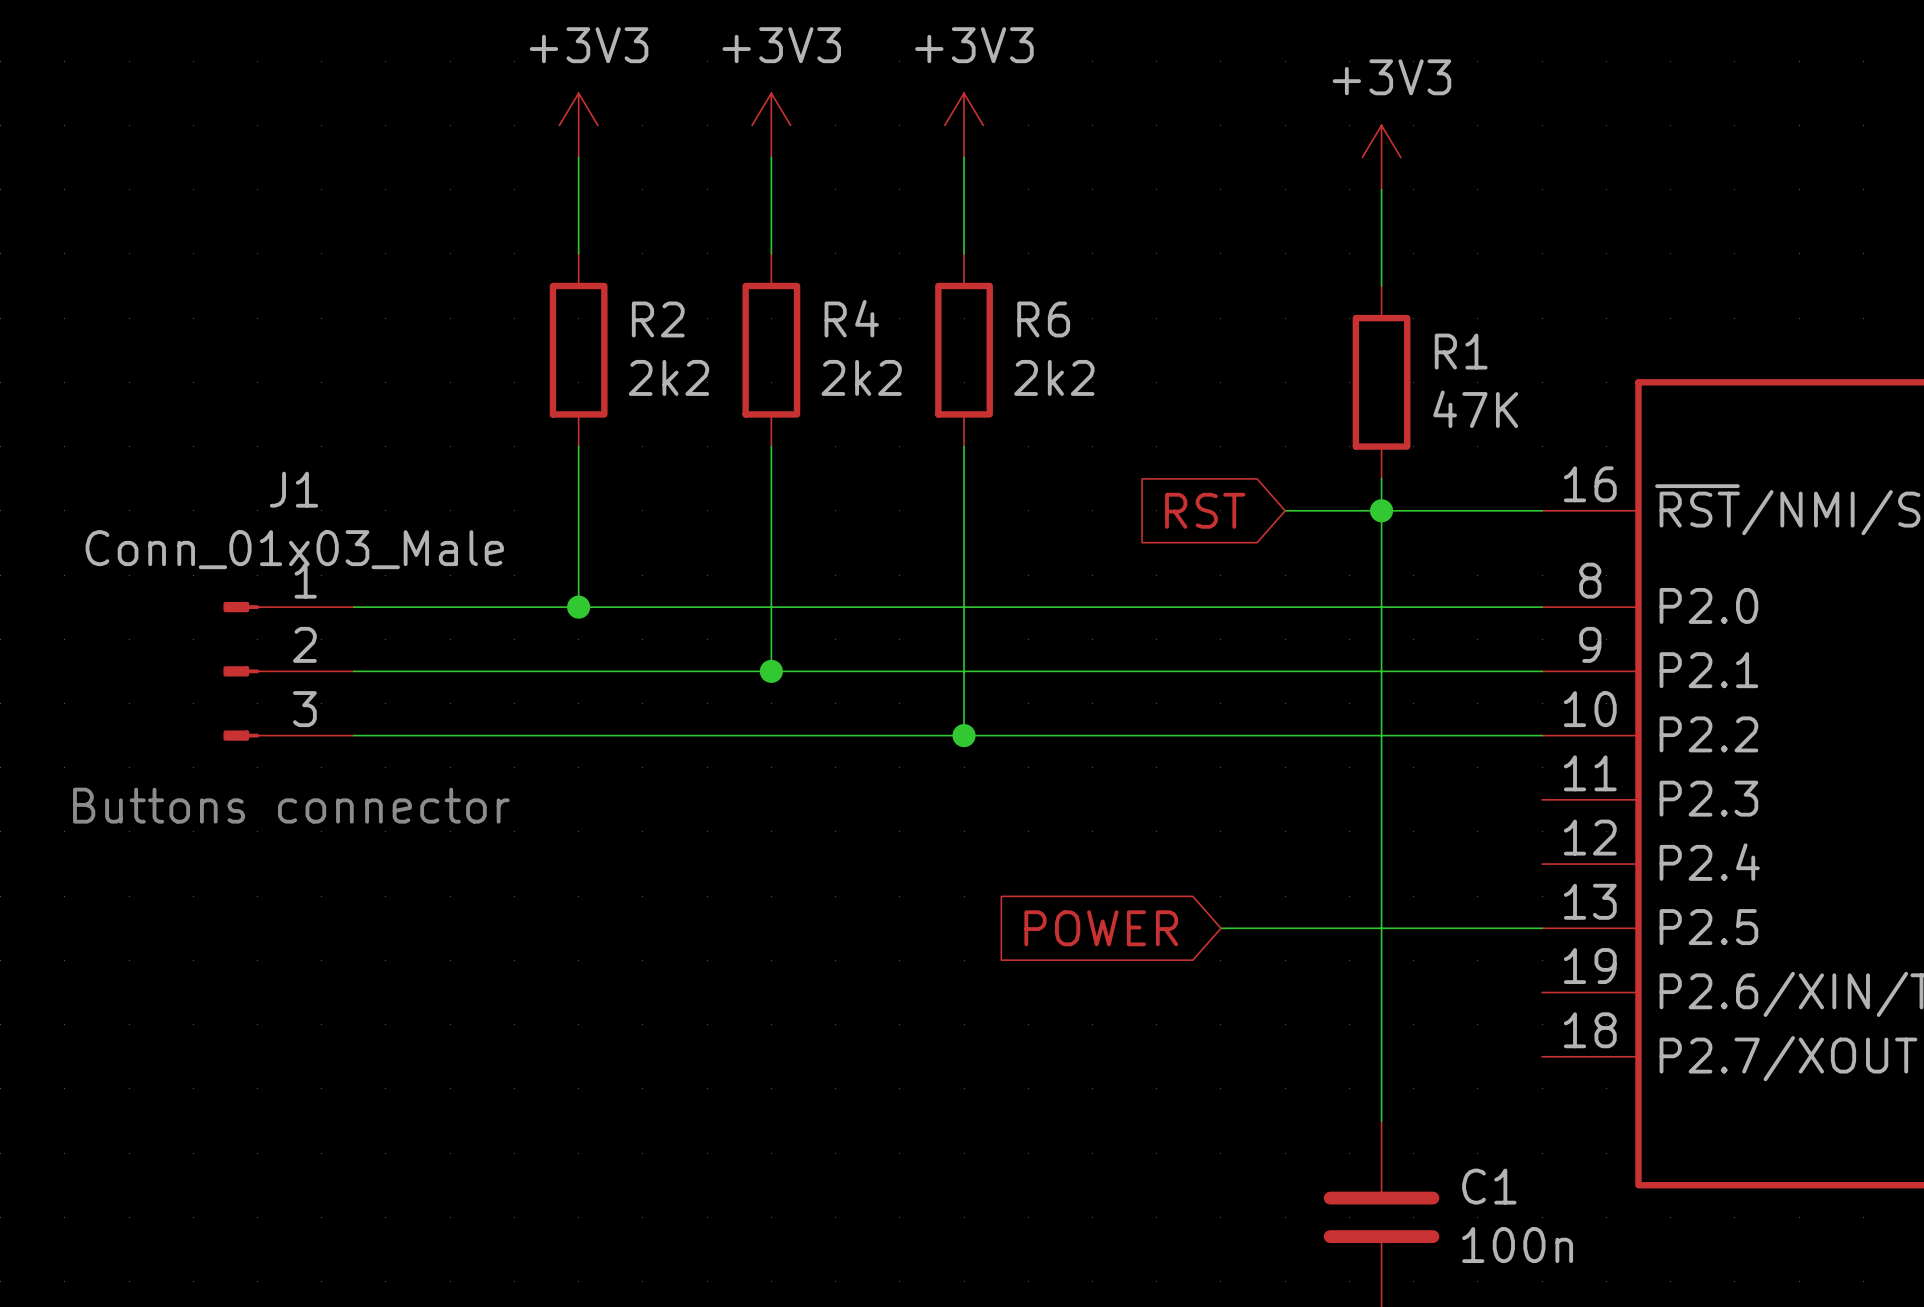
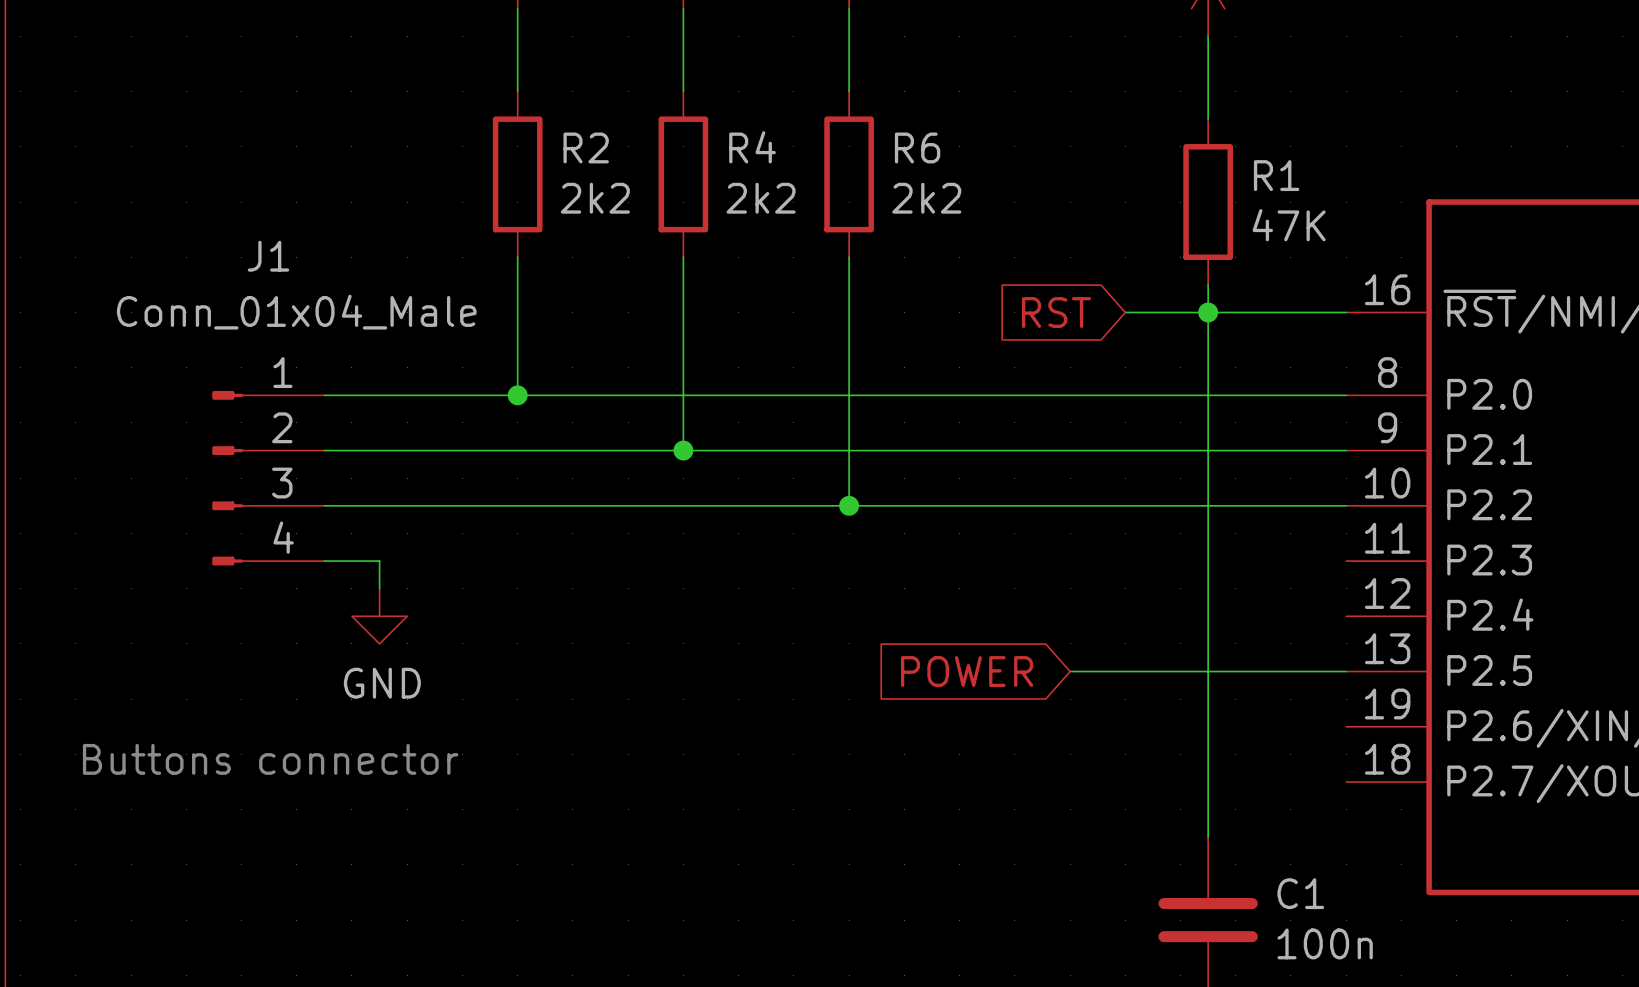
J1 name position: J1 (293, 489) -> J1 (268, 256)
J1 value: Conn_01x03_Male (294, 549) -> Conn_01x04_Male (296, 312)
J1 symbol: [223, 602, 354, 741] -> [212, 390, 325, 566]
wire: none -> (324, 561) (379, 561) (379, 588)
text position: Buttons connector (291, 805) -> Buttons connector (270, 759)
power symbol: none -> GND (379, 616)

